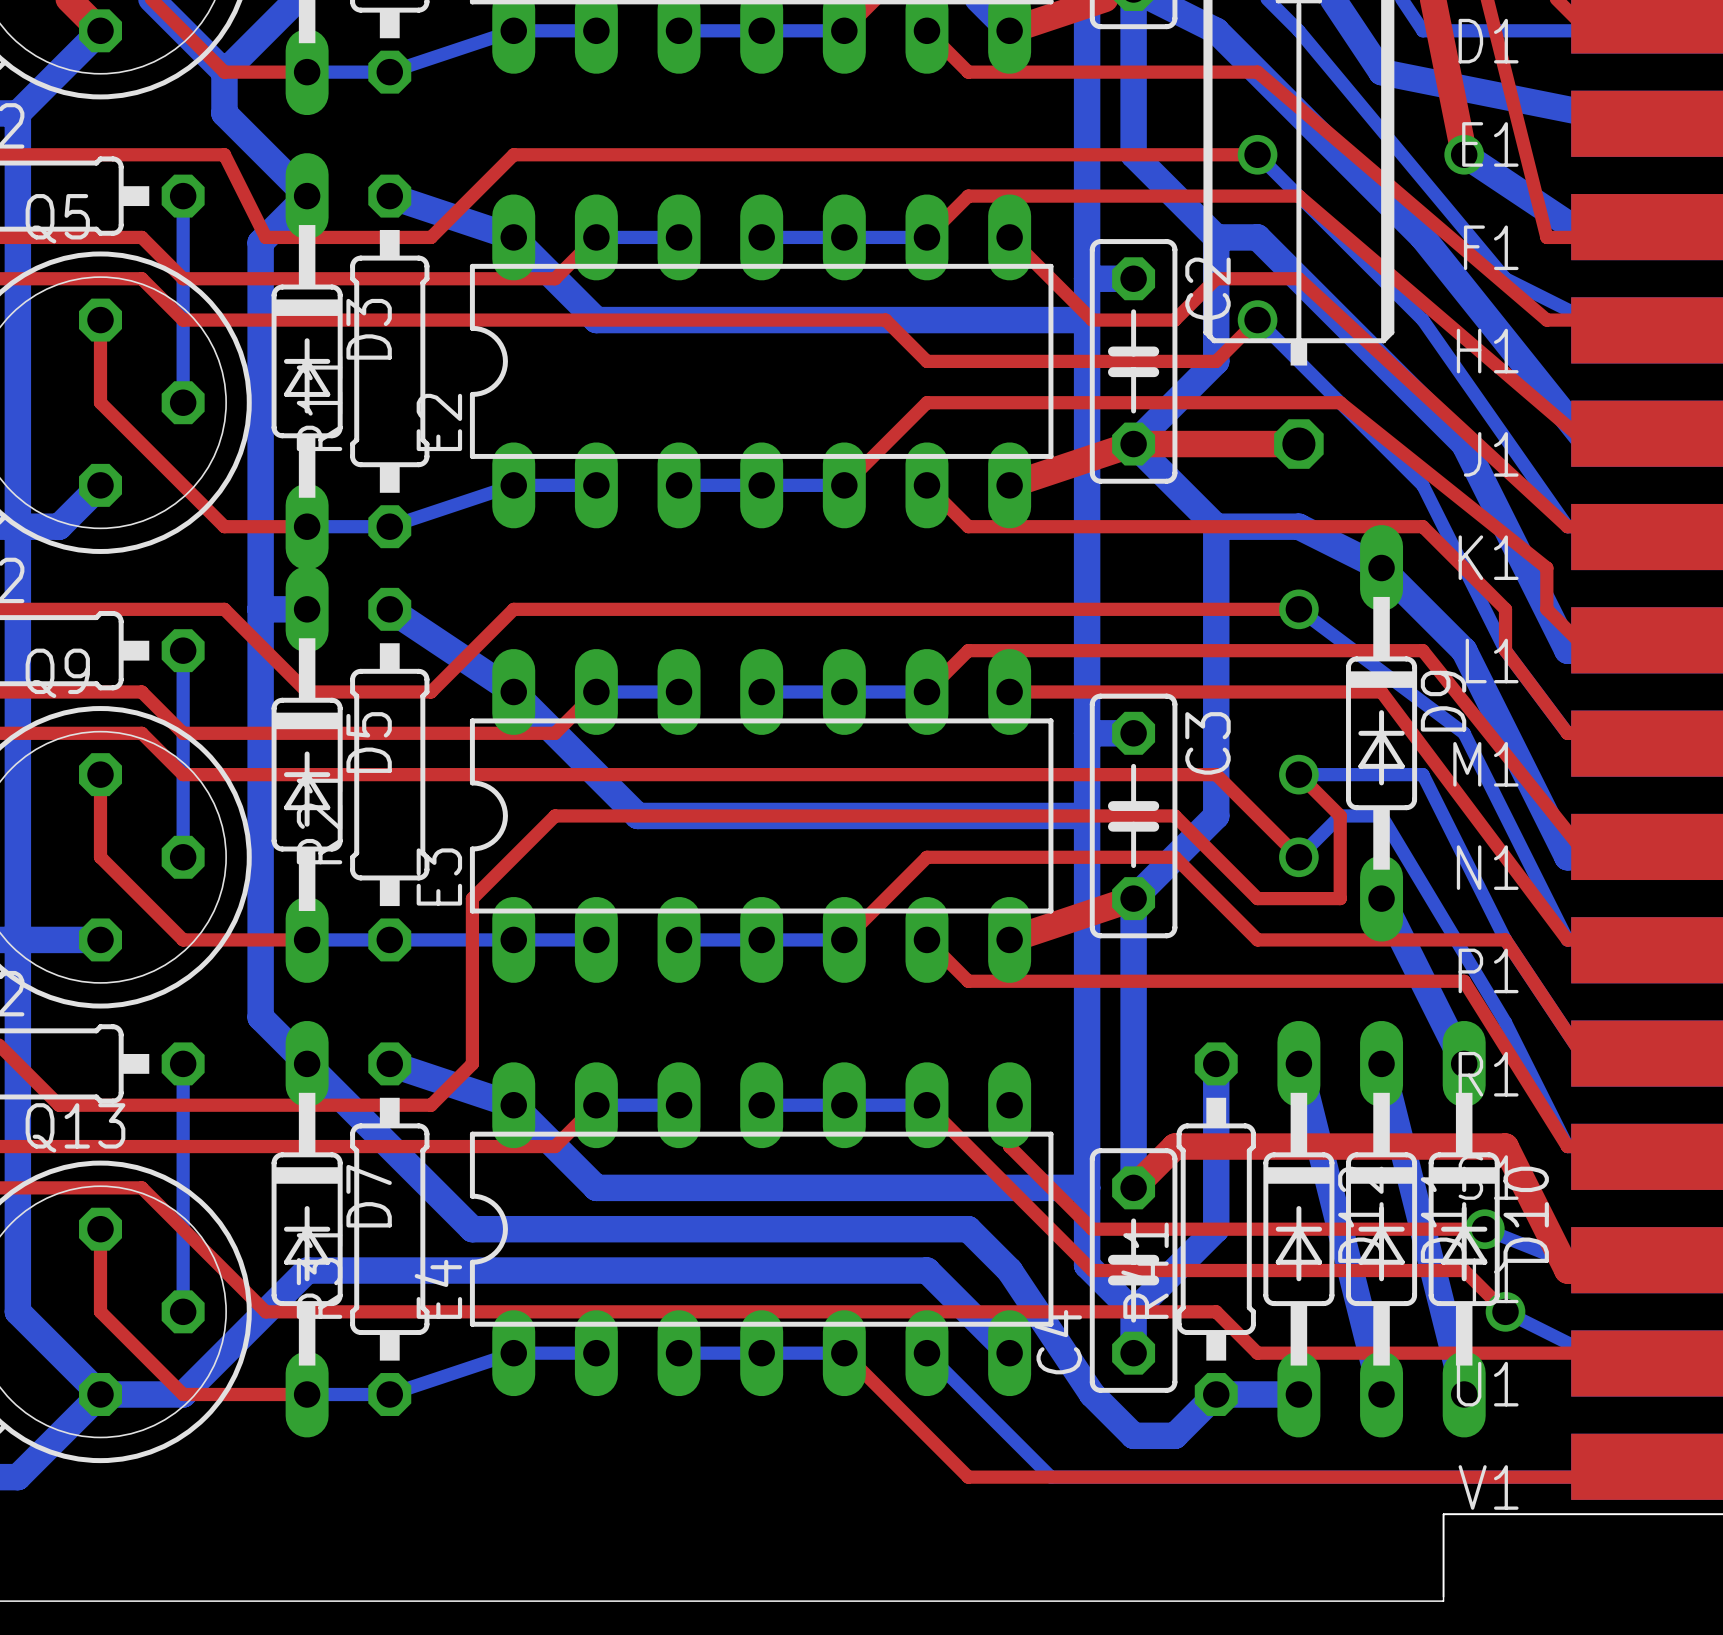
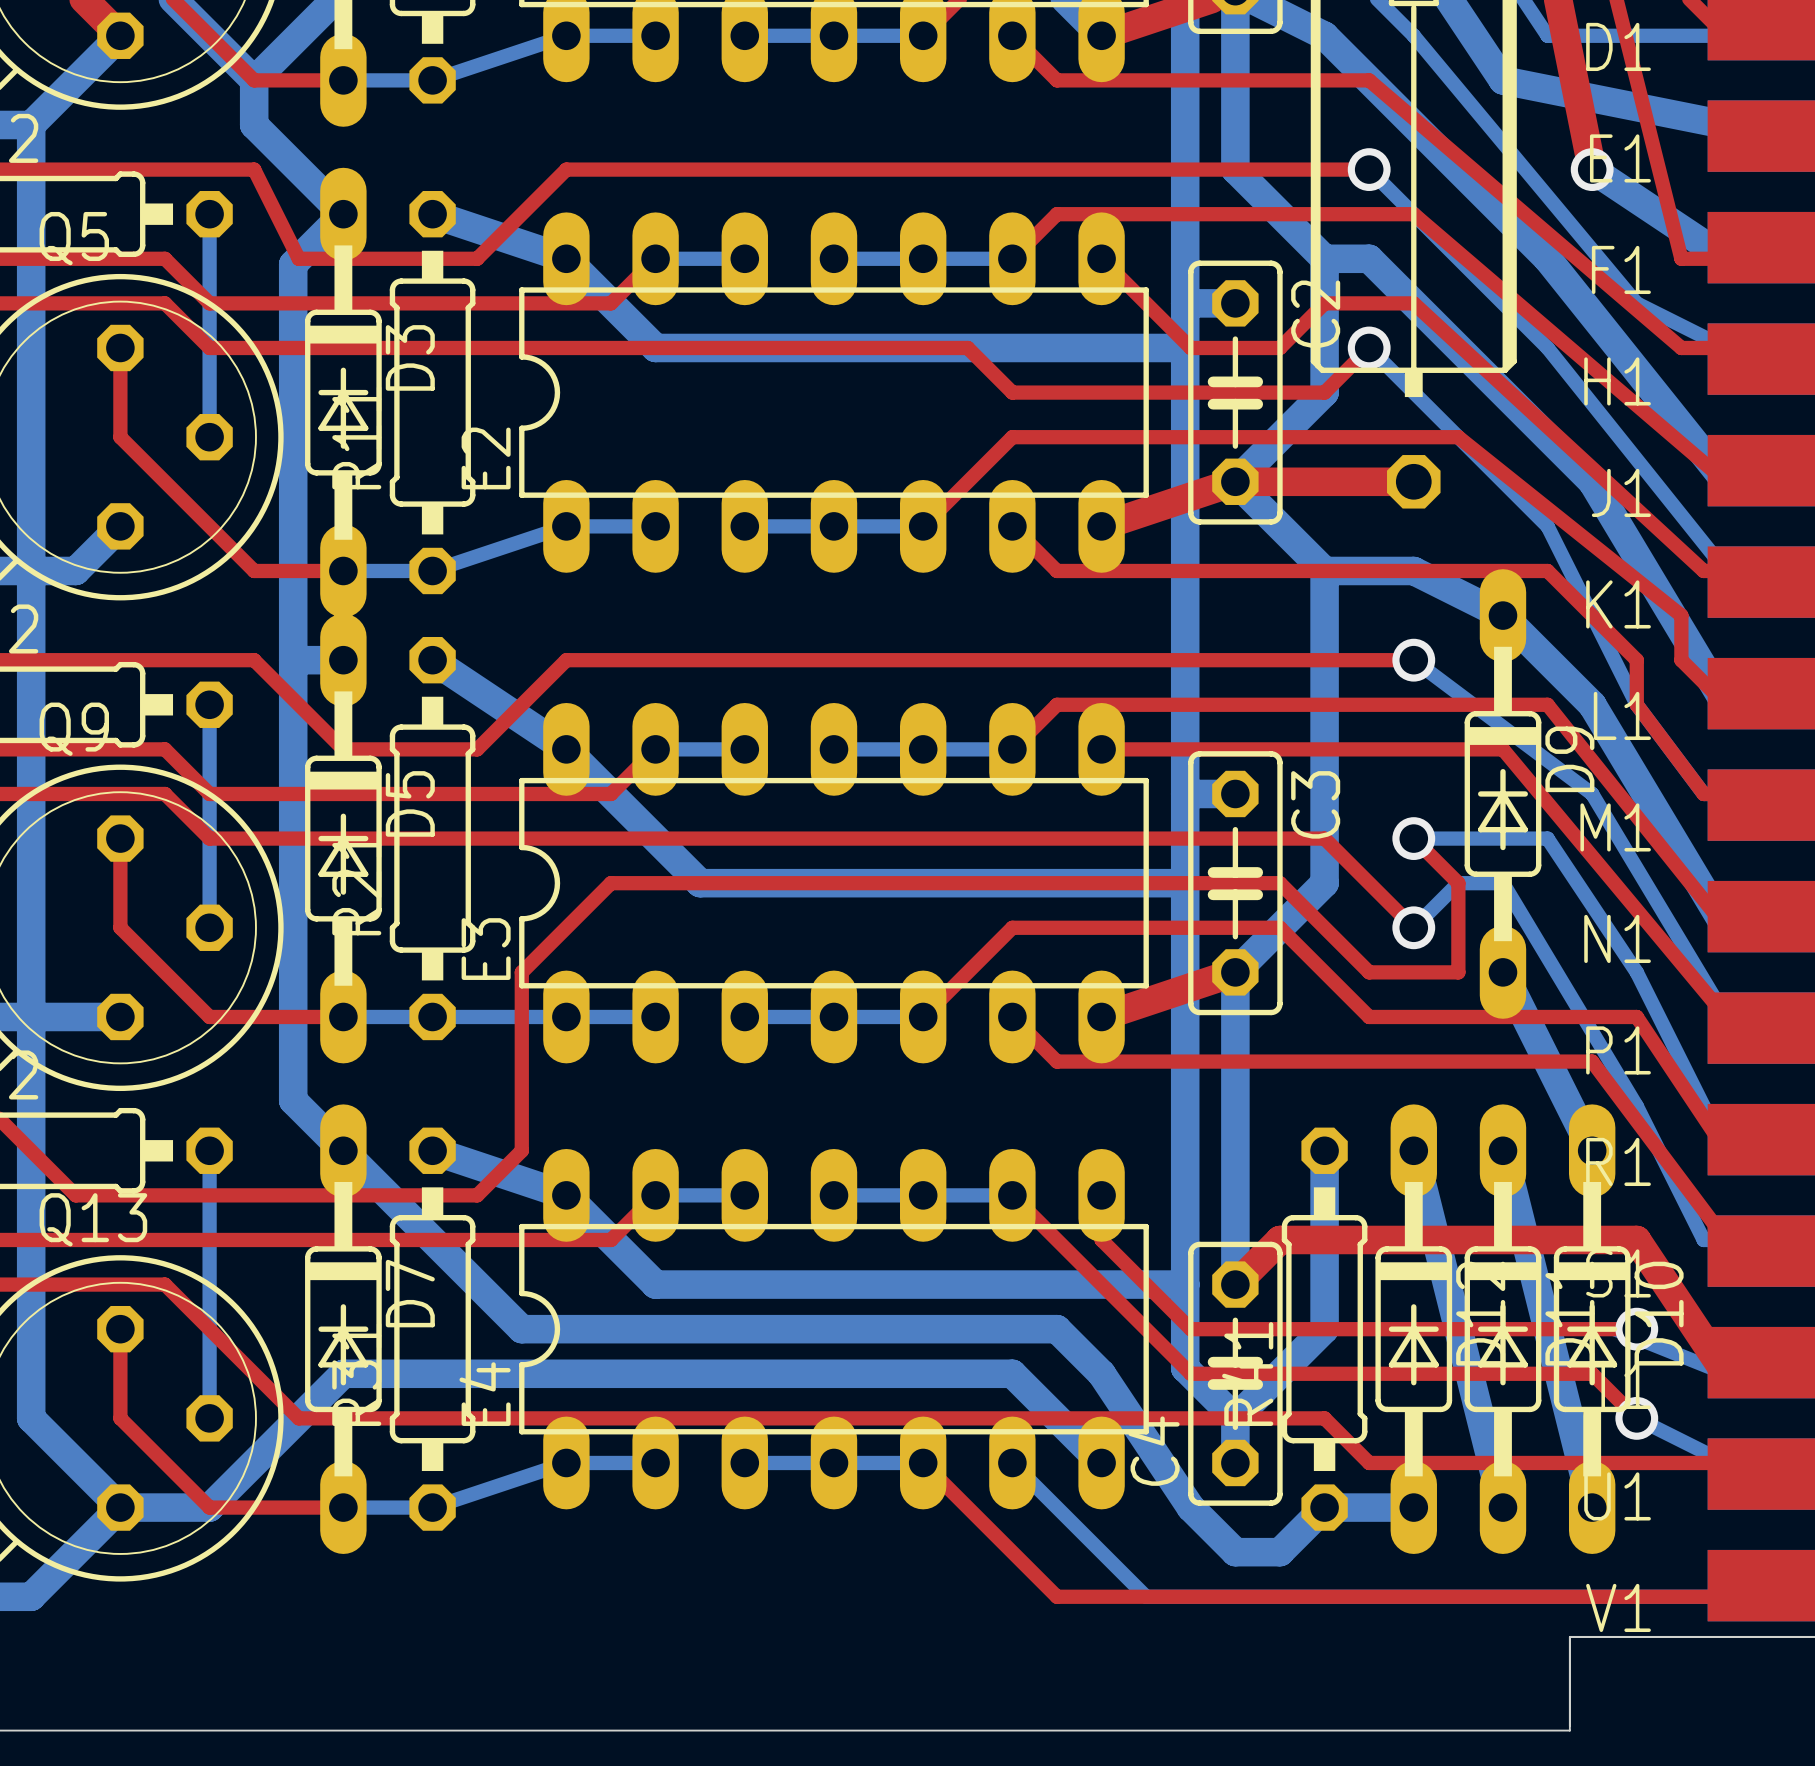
bottom track: (1422, 320) (1567, 526) (1588, 526) -> (1547, 347) (1725, 570)
bottom track: (1464, 444) (1567, 650) (1588, 650) -> (1592, 481) (1725, 704)
bottom track: (1464, 650) (1567, 857) (1588, 857) -> (1592, 704) (1725, 927)
top track: (1381, 691) (1567, 939) (1588, 939) -> (1502, 749) (1725, 1016)
bottom track: (1464, 733) (1567, 939) (1588, 939) -> (1592, 793) (1725, 1016)
bottom track: (1422, 774) (1505, 939) (1588, 1063) -> (1547, 838) (1636, 972) (1725, 1150)
top track: (1464, 981) (1567, 1146) (1588, 1146) -> (1592, 1061) (1725, 1239)
top track: (1505, 1146) (1567, 1270) (1588, 1270) -> (1636, 1239) (1725, 1373)
via position: (1484, 1229) -> (1636, 1329)

